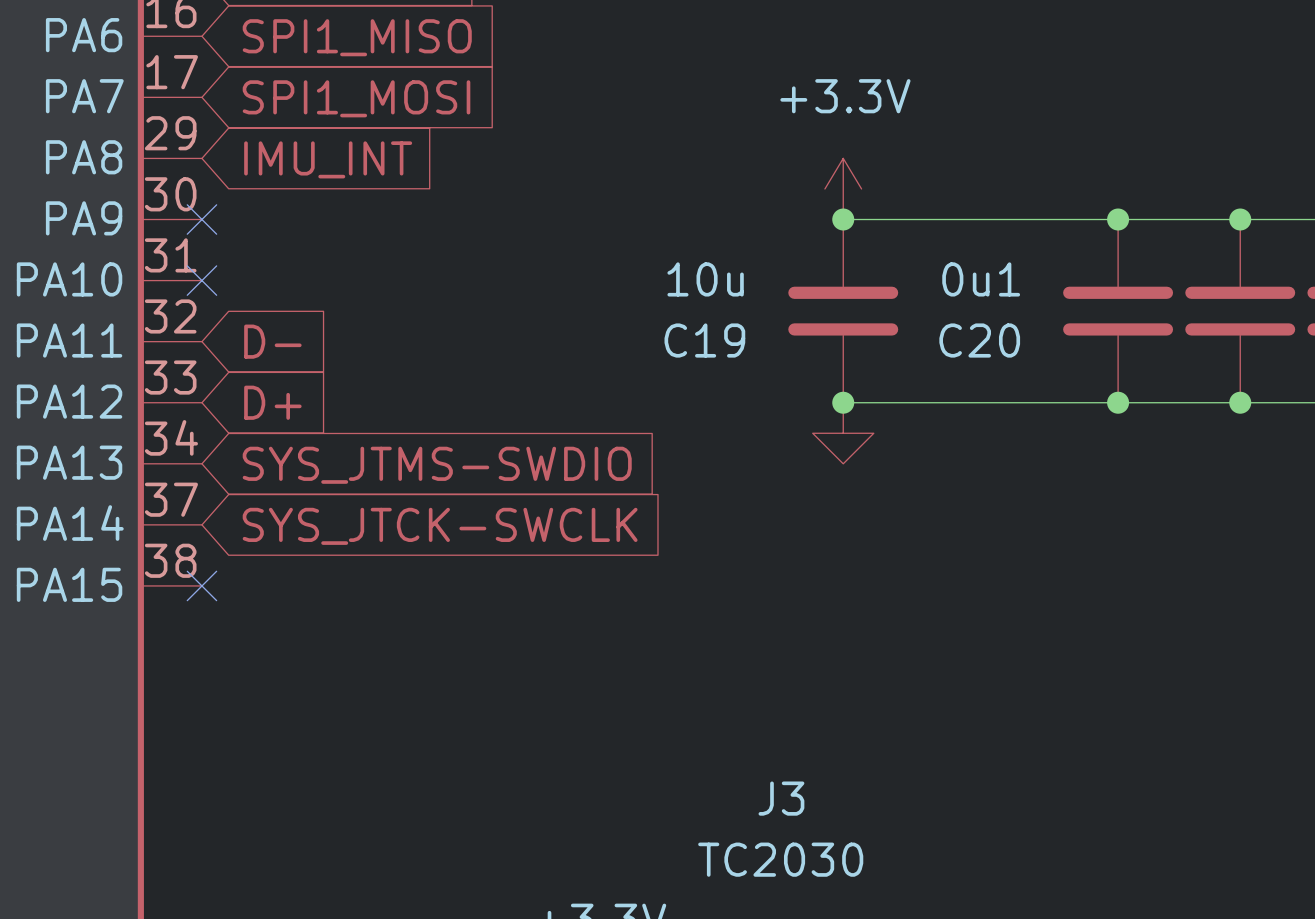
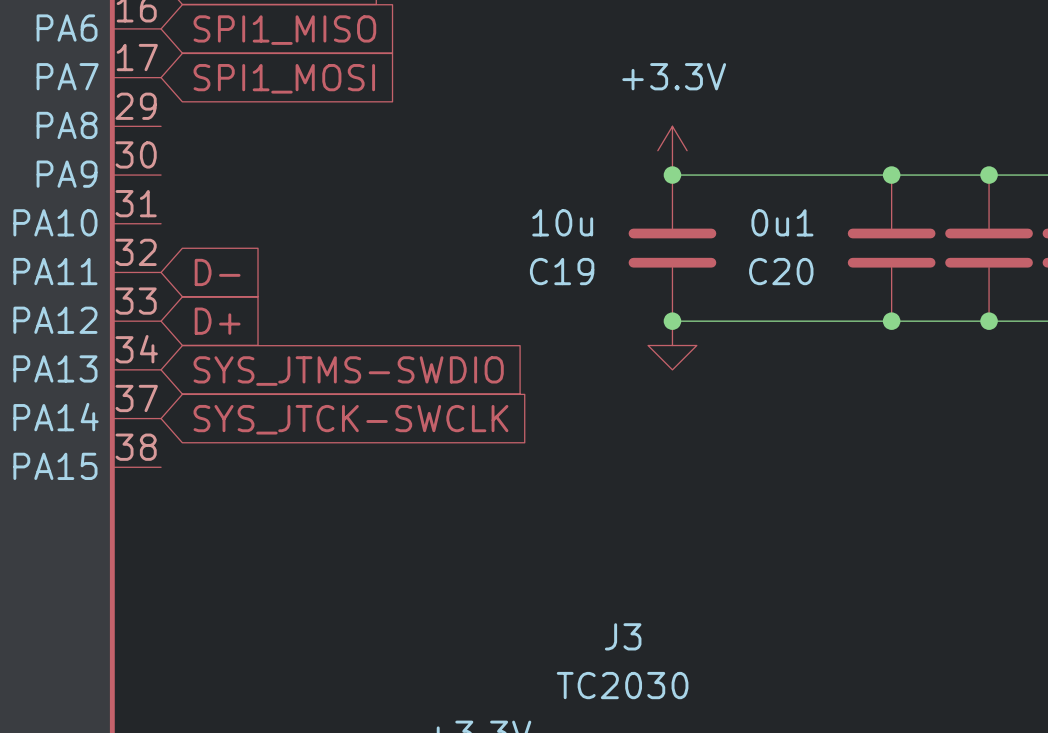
global label: IMU_INT (328, 159) -> none
no-connect mark: (201, 219) -> none
no-connect mark: (201, 280) -> none
no-connect mark: (201, 585) -> none

